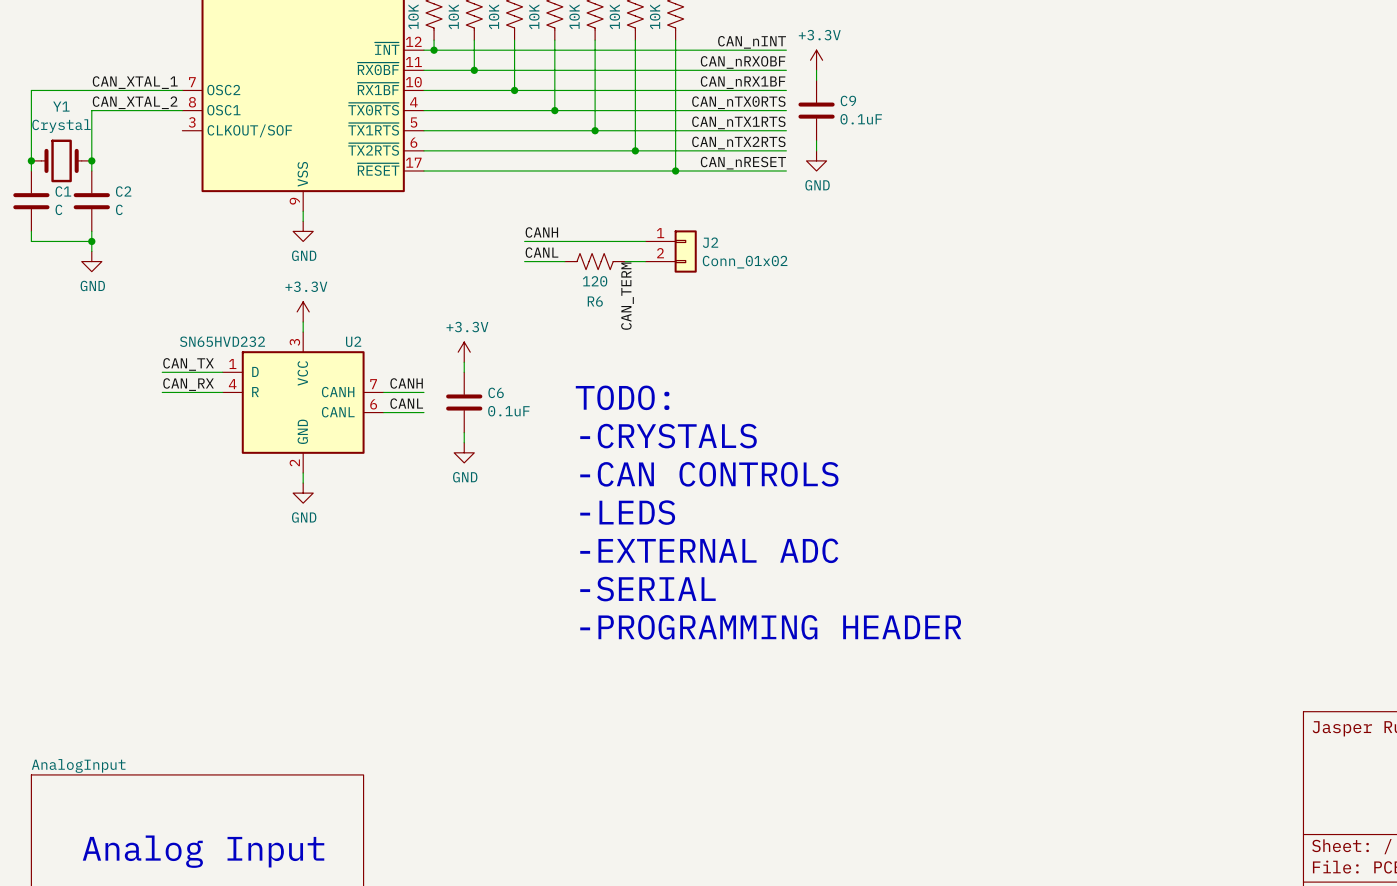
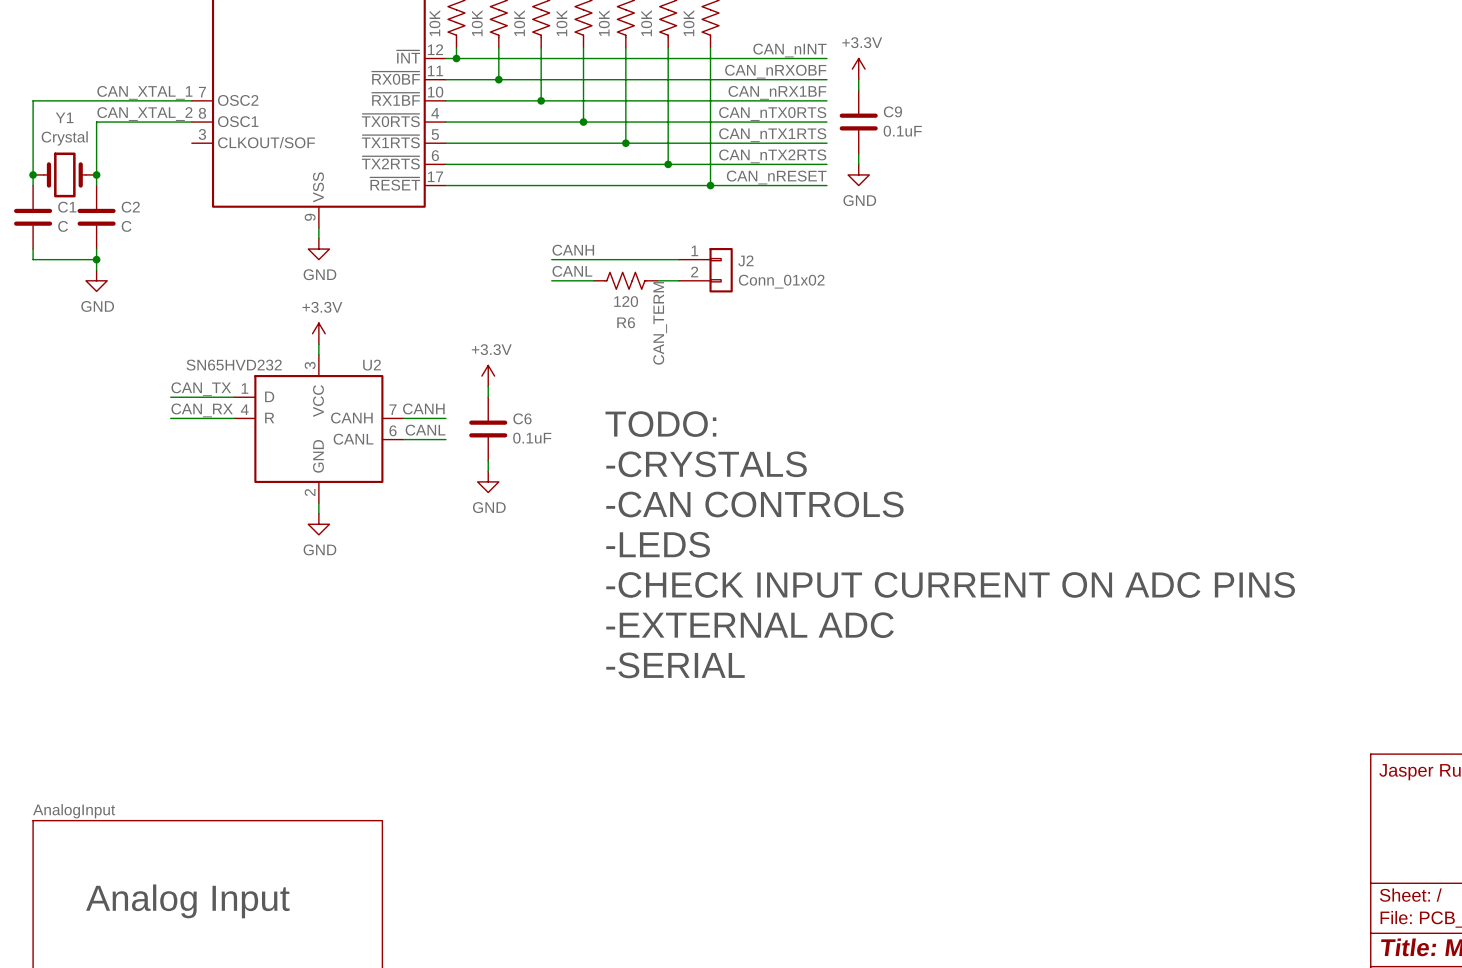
text: -EXTERNAL ADC (709, 550) -> -CHECK INPUT CURRENT ON ADC PINS (950, 584)
text: -SERIAL (647, 589) -> -EXTERNAL ADC (750, 625)
text: -PROGRAMMING HEADER (770, 627) -> -SERIAL (675, 665)

